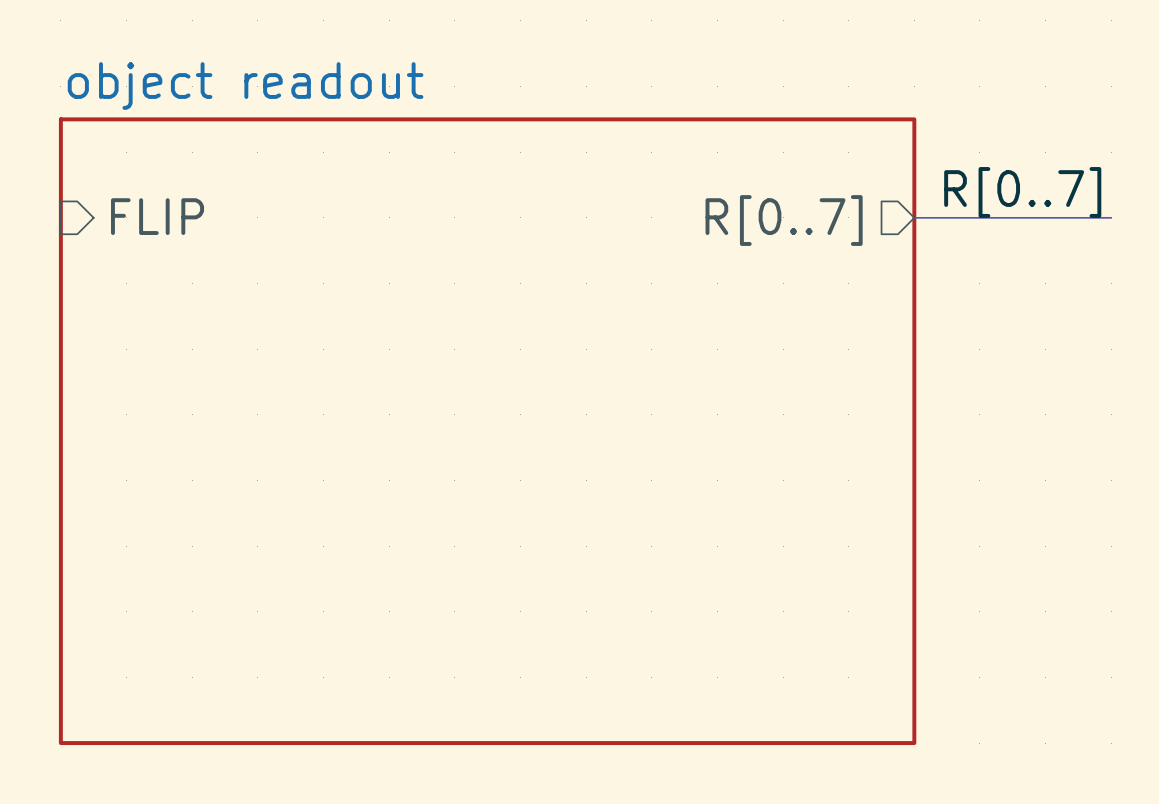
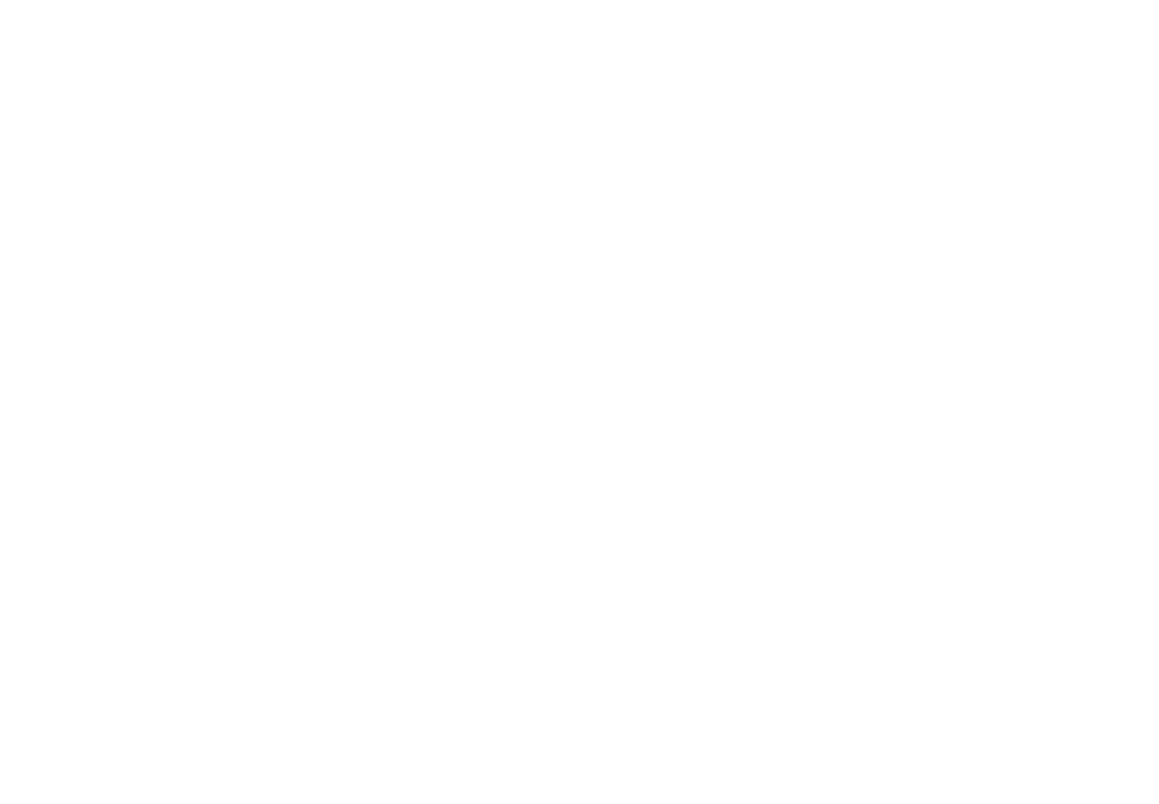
label: R[0..7] (1022, 192) -> none
sheet pin: FLIP (157, 216) -> none
bus: (914, 217) (1111, 217) -> none
sheet pin: R[0..7] (784, 220) -> none
sheet object readout: (487, 431) -> none

